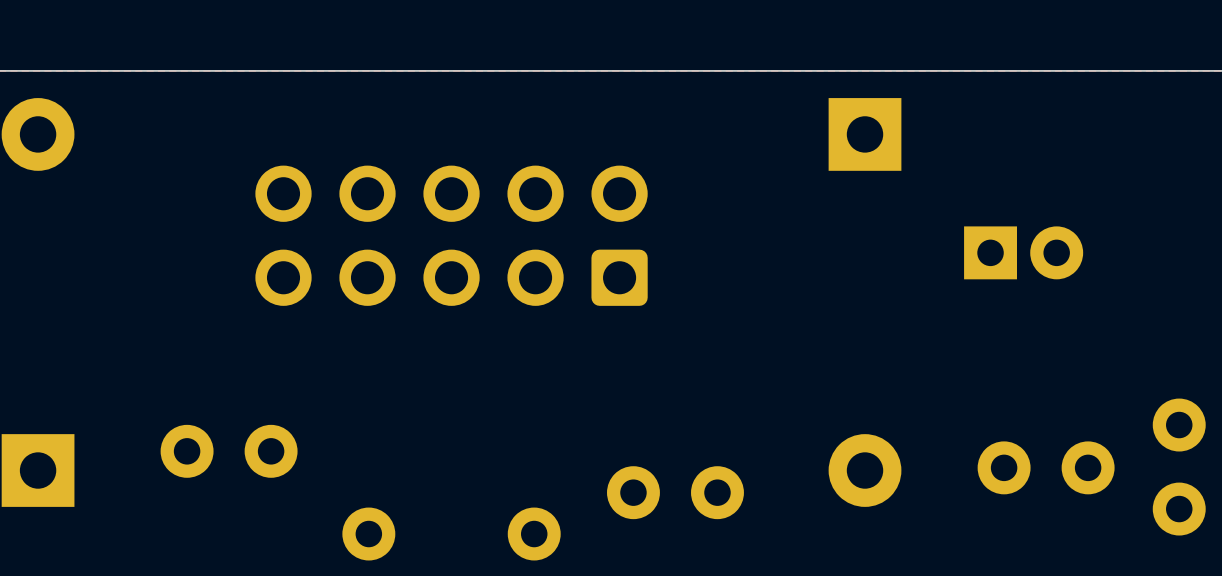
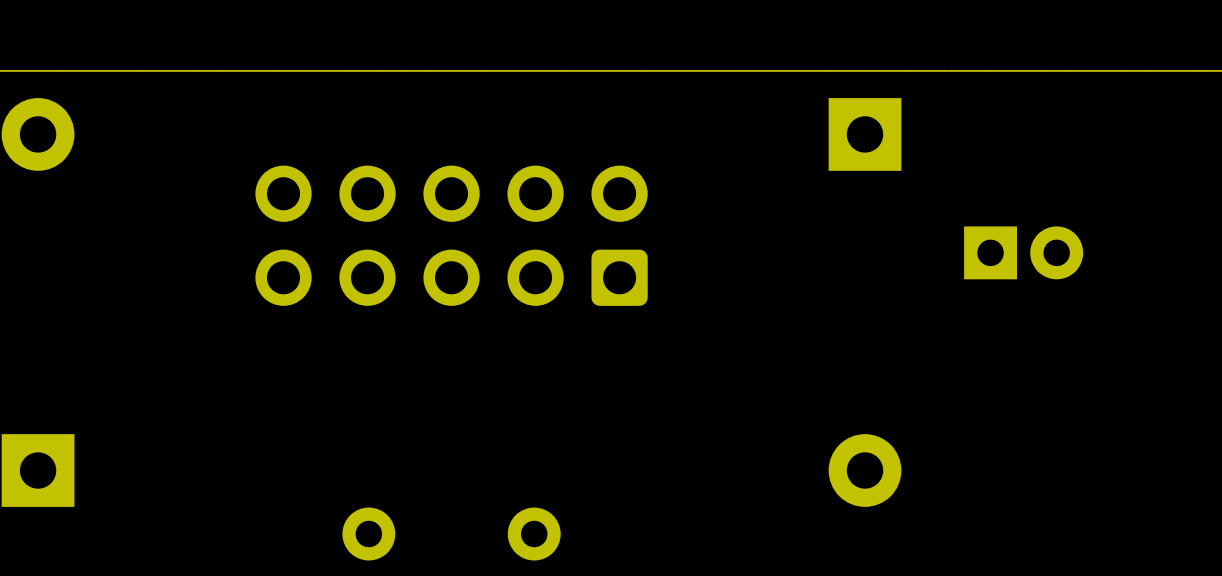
part: (229, 451) -> none
part: (1046, 467) -> none
part: (1179, 467) -> none
part: (675, 492) -> none

